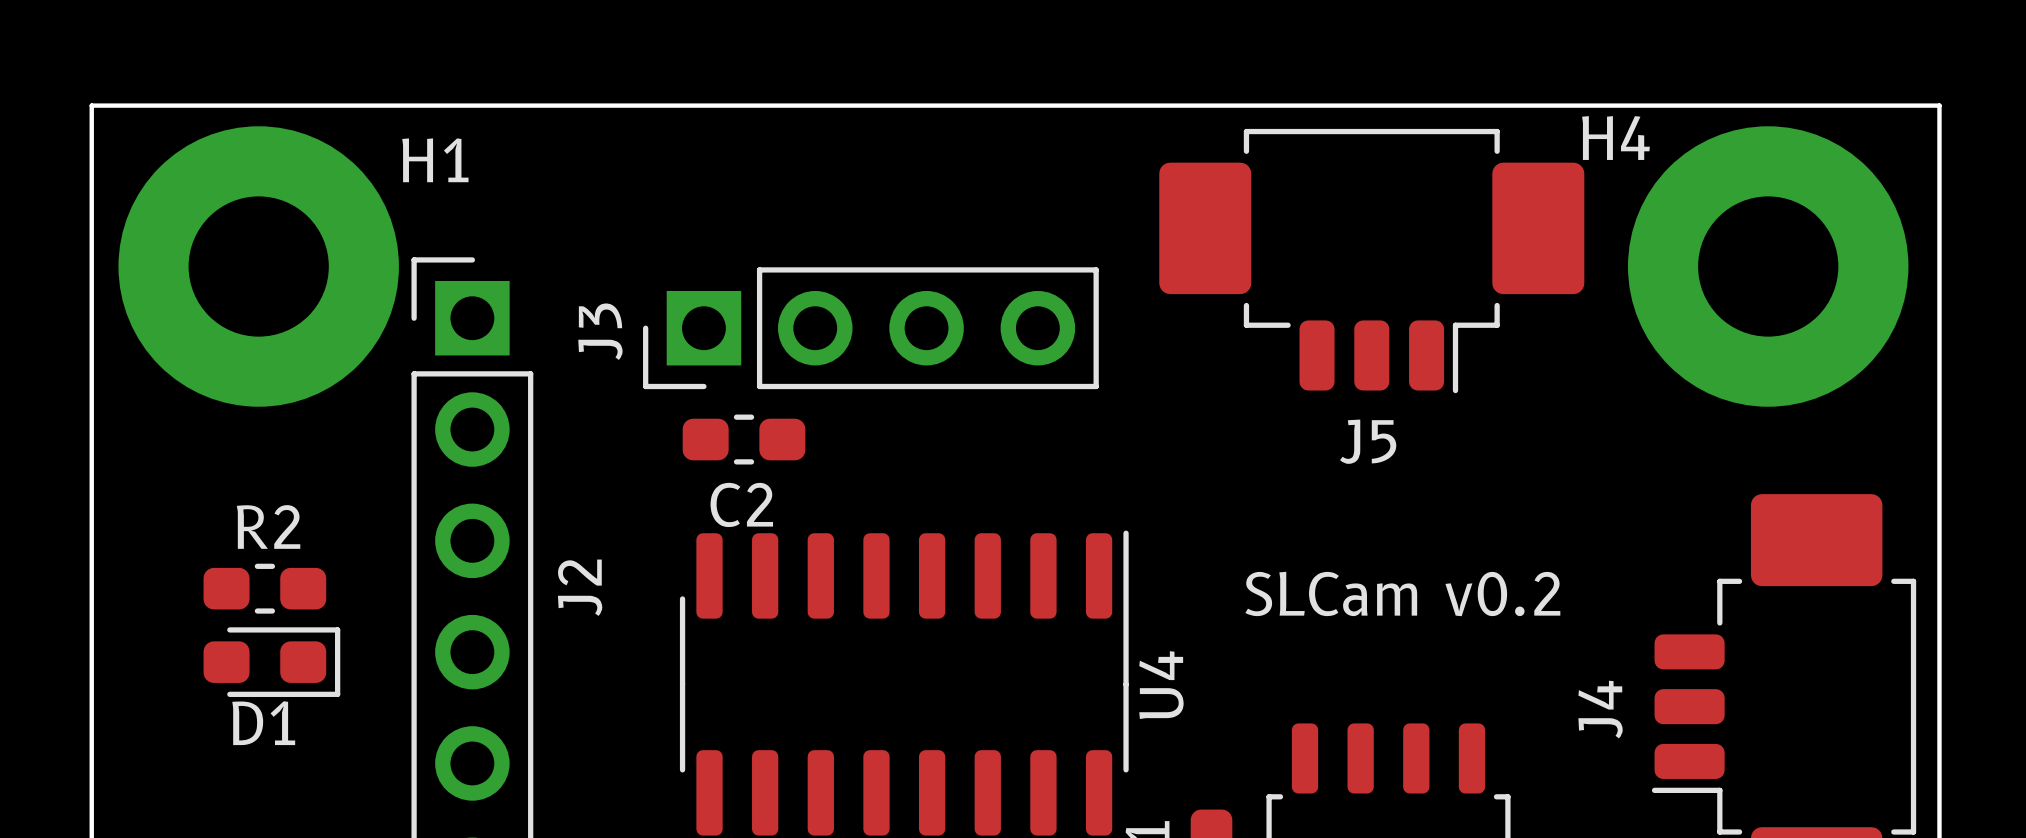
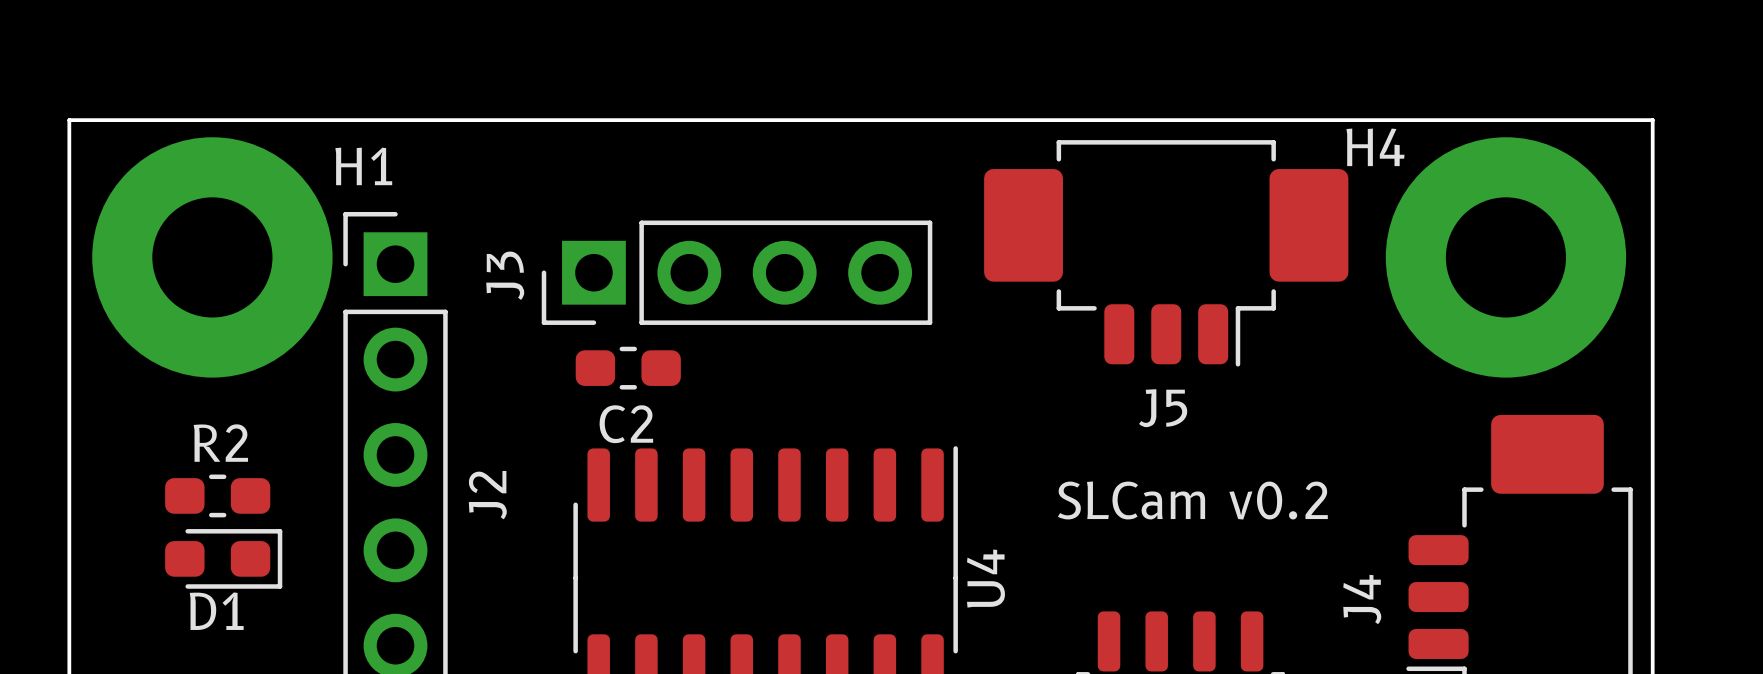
board edge: (91, 150) (91, 105) (1939, 105) (1939, 150) -> (69, 120) (1652, 120)
J5 position: (1371, 261) -> (1166, 253)
H1 position: (258, 266) -> (212, 257)
H4 position: (1768, 266) -> (1505, 257)

